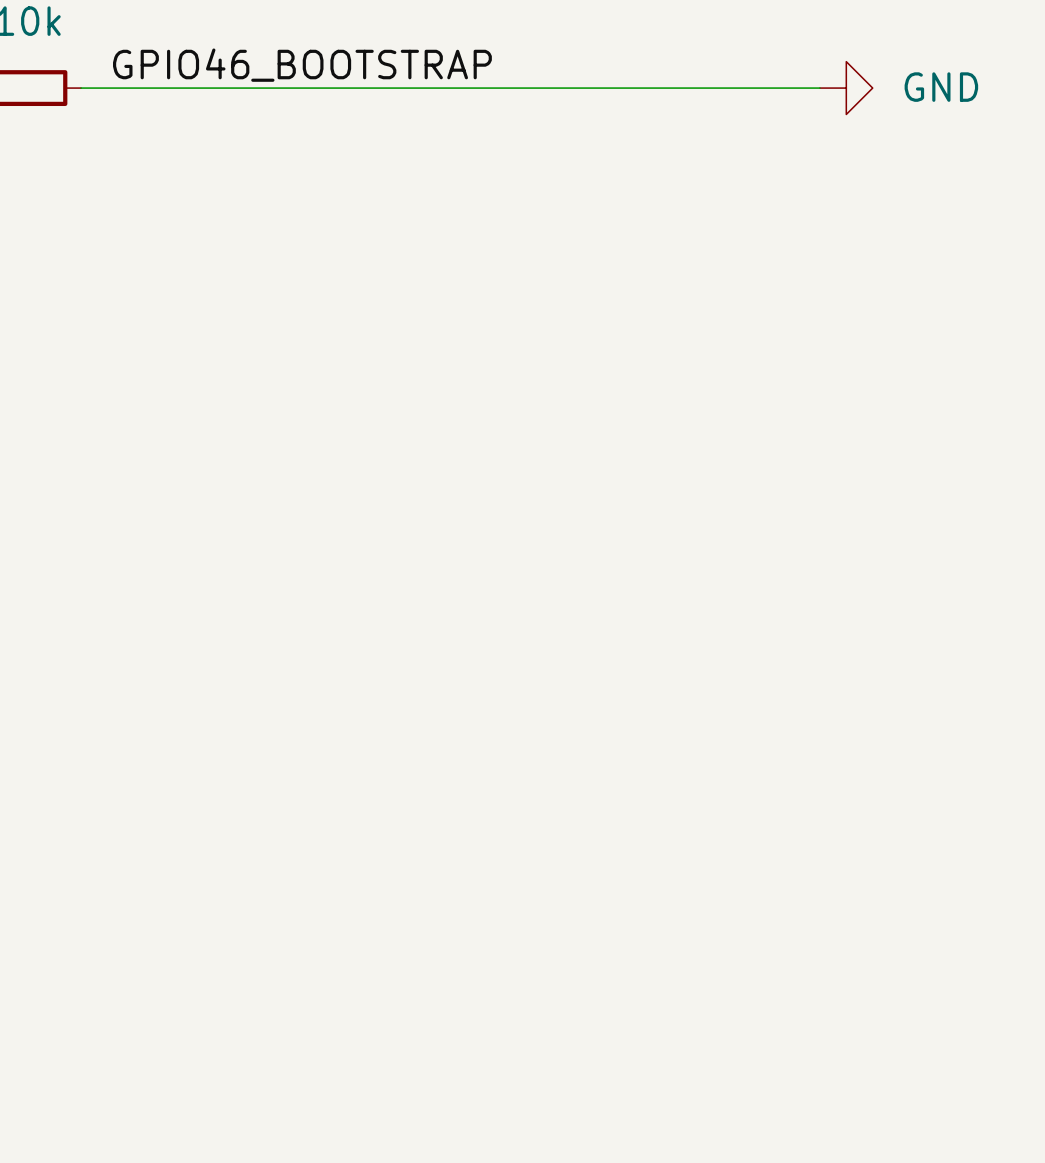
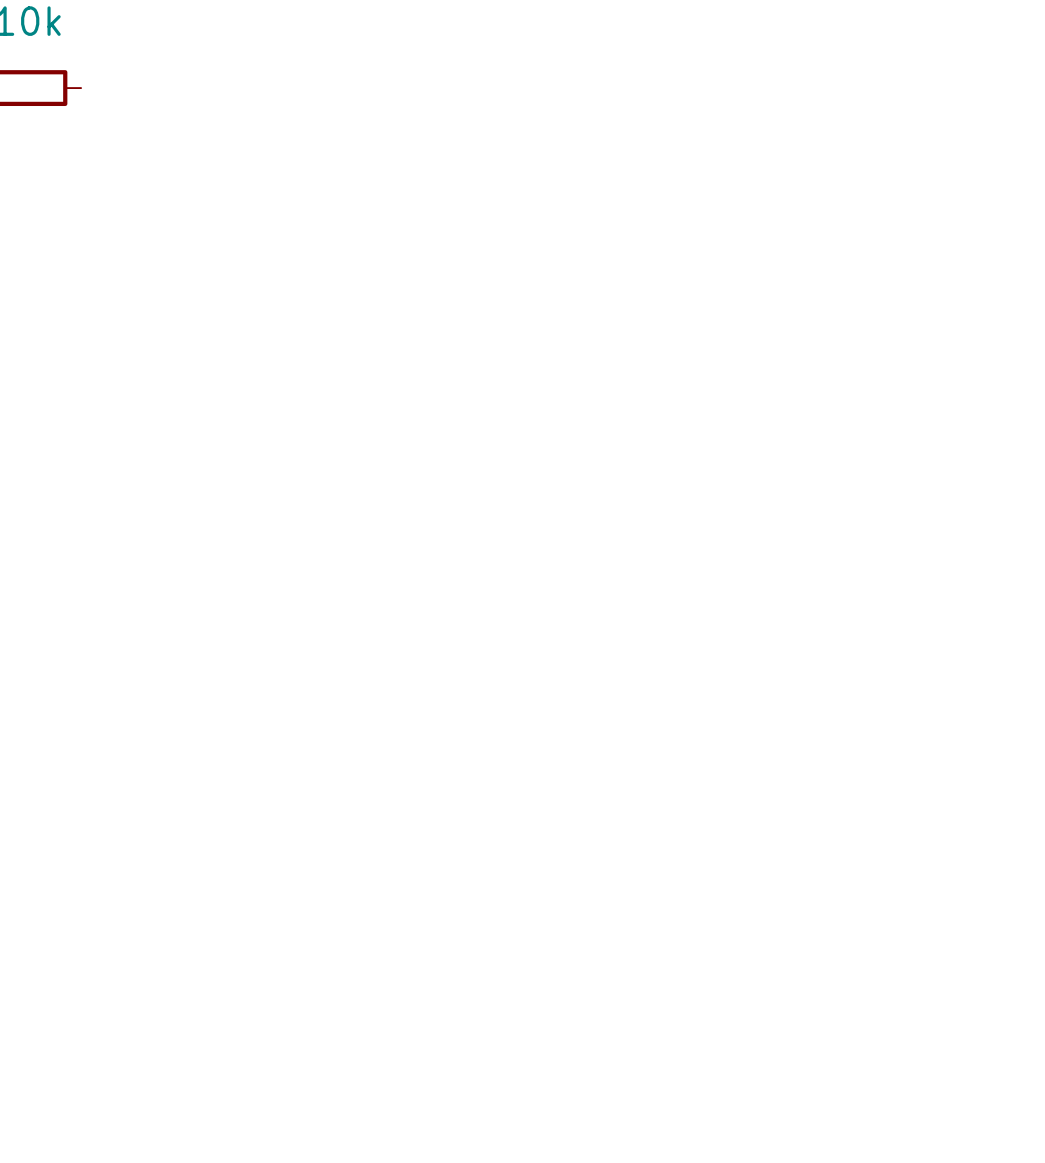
label: GPIO46_BOOTSTRAP (302, 65) -> none
wire: (81, 88) (819, 88) -> none
power symbol: GND (846, 88) -> none

